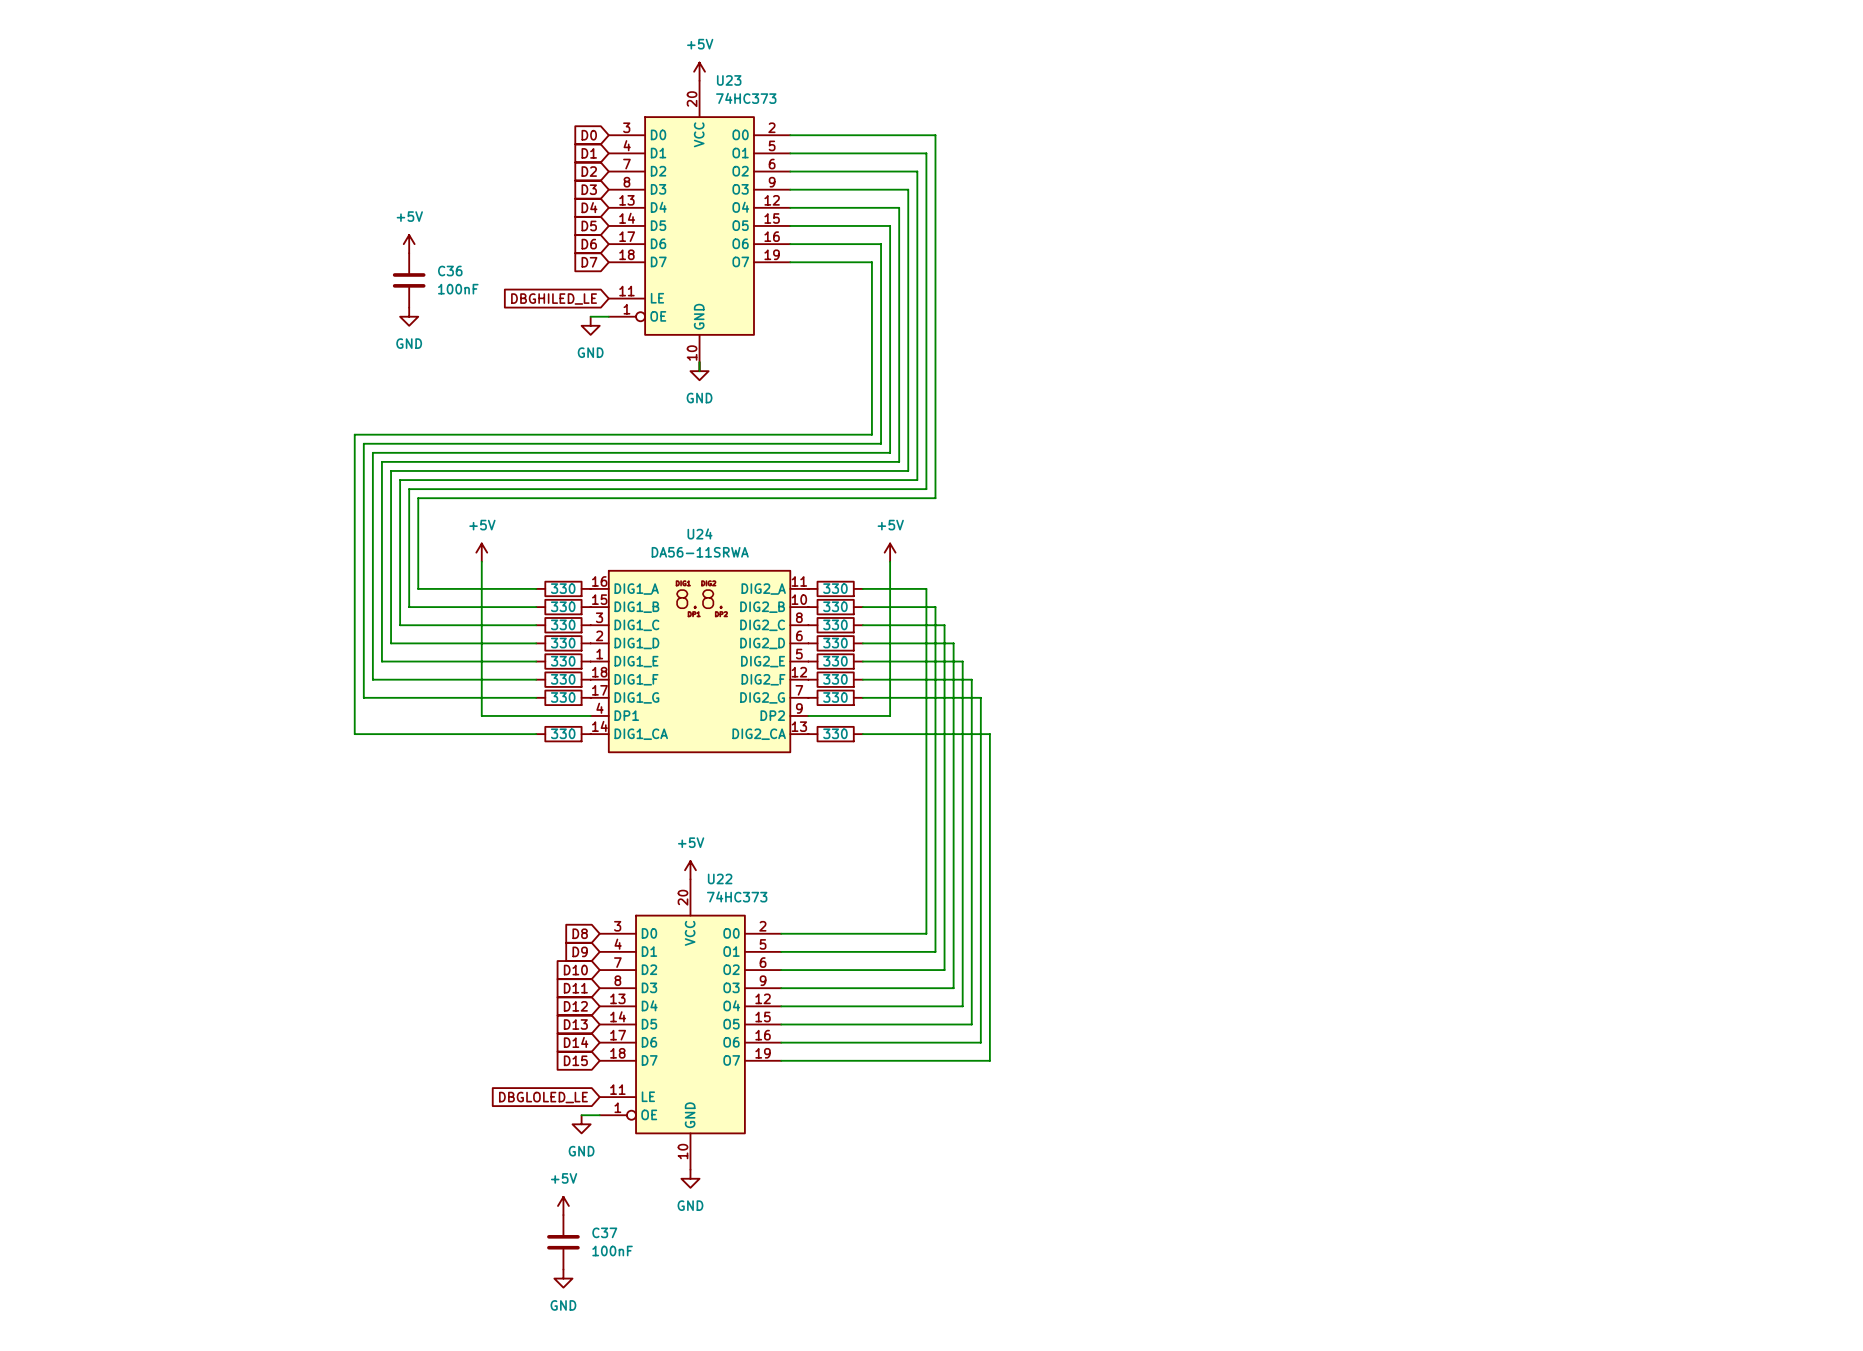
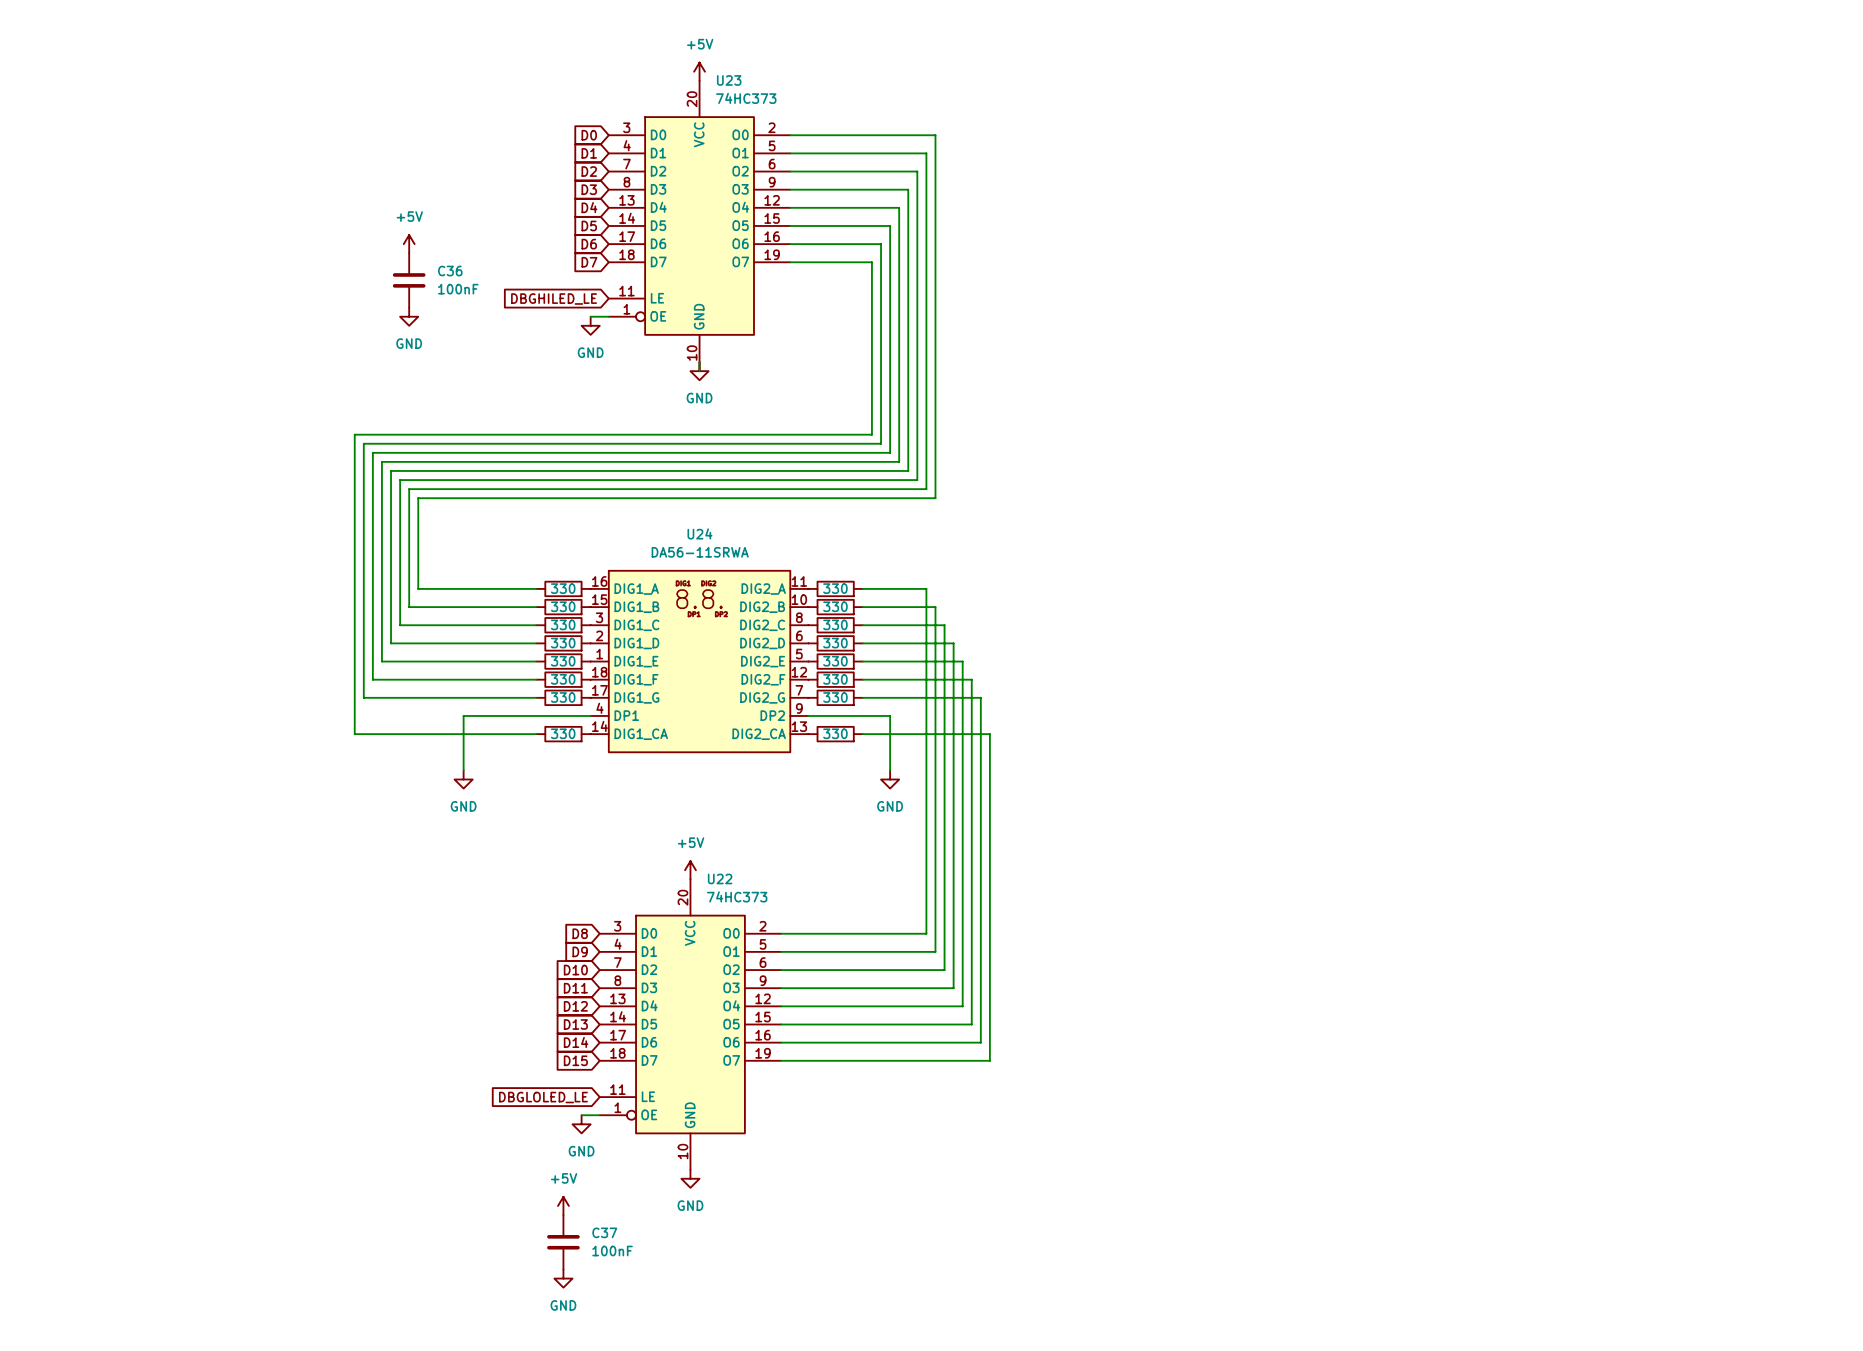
power symbol: +5V (481, 552) -> none
power symbol: +5V (890, 552) -> none
wire: (481, 561) (481, 715) -> (463, 770) (463, 715) (481, 715)
wire: (890, 561) (890, 715) -> (890, 770) (890, 715)
power symbol: none -> GND (463, 779)
power symbol: none -> GND (890, 779)

